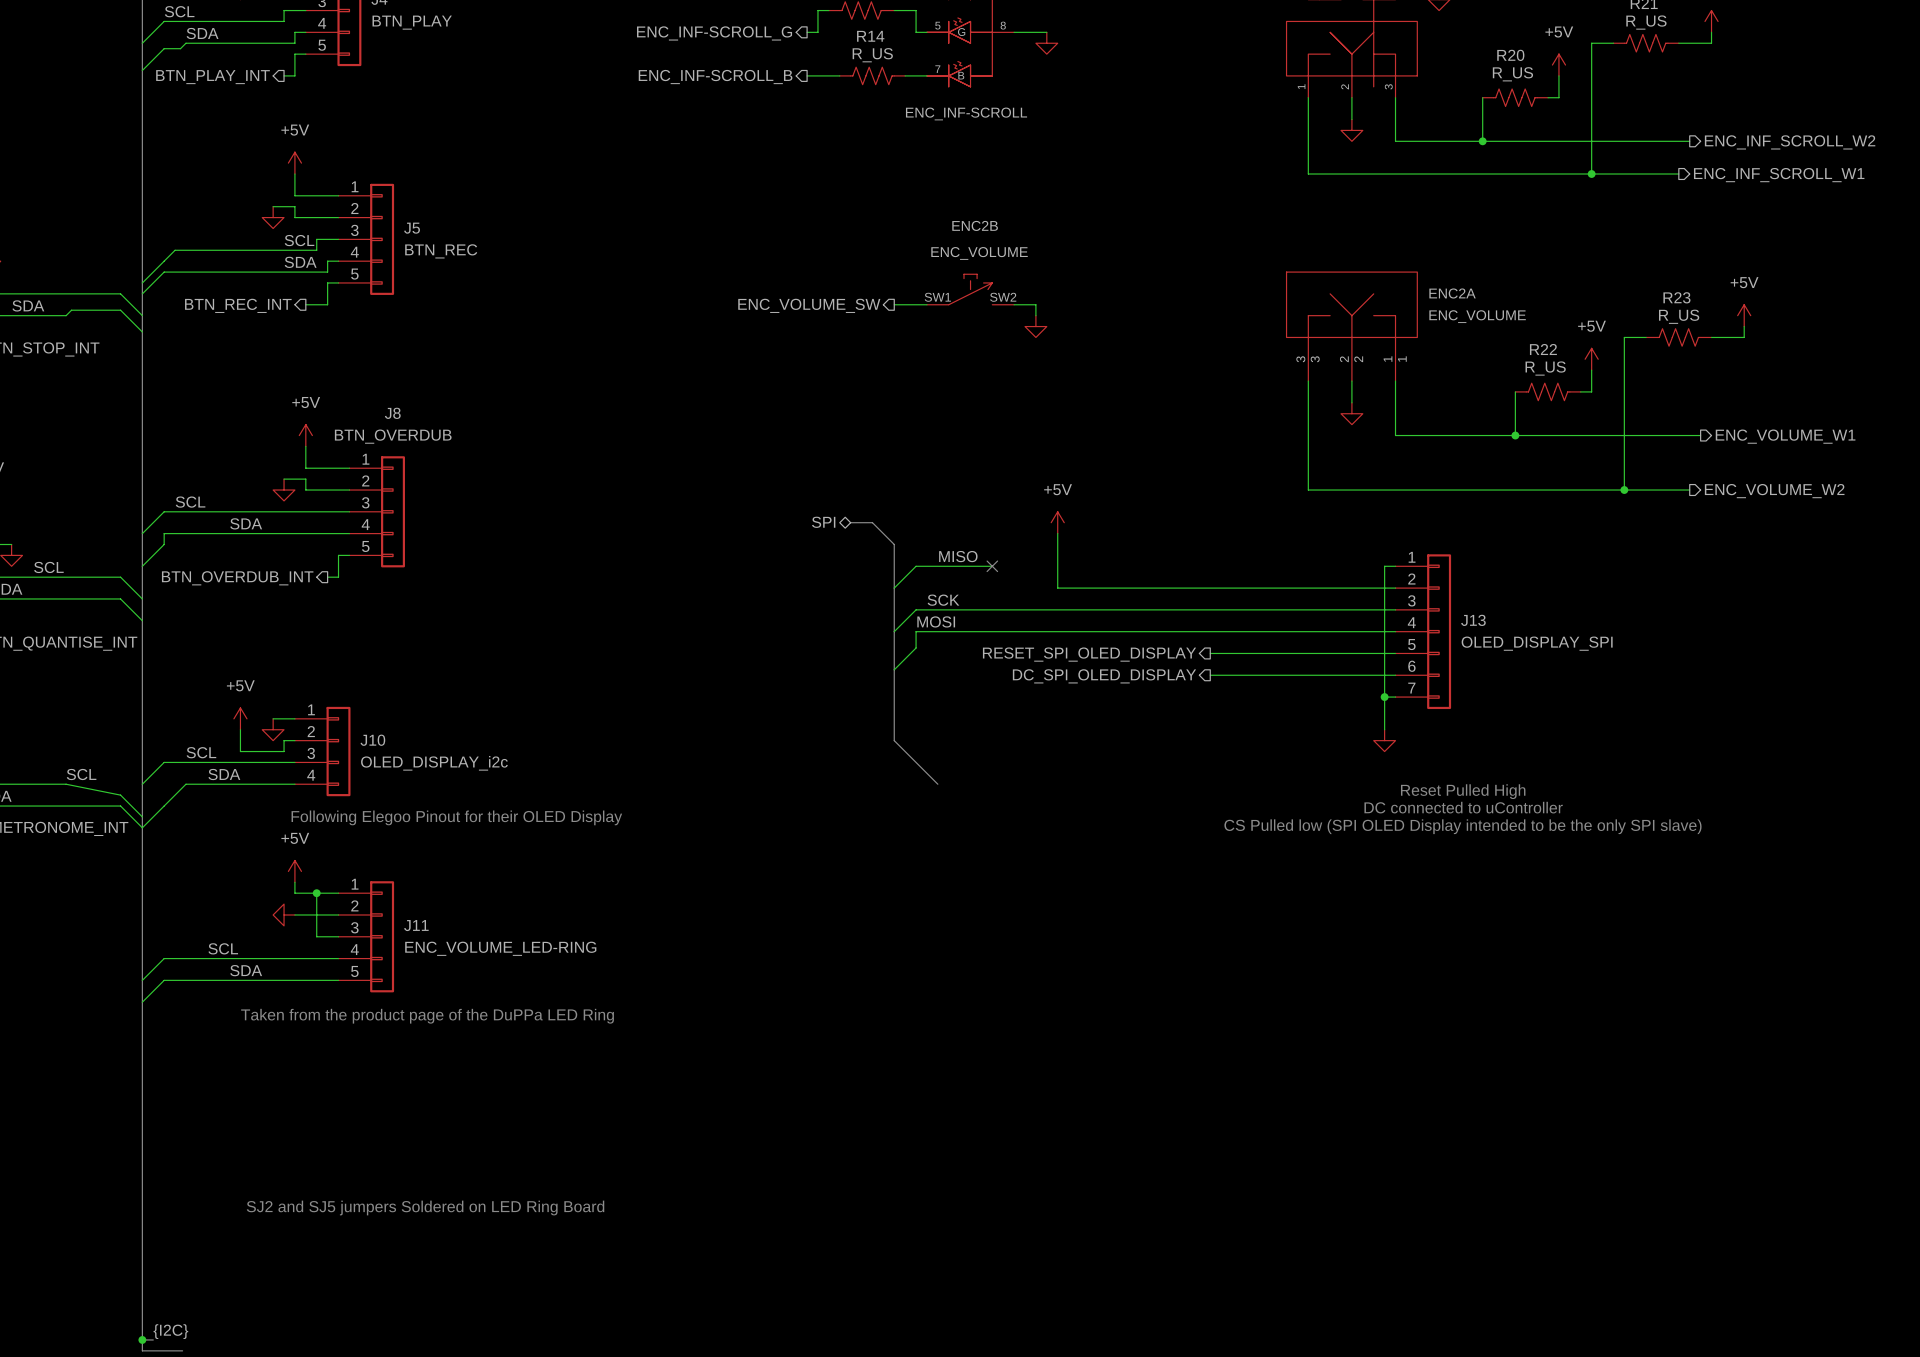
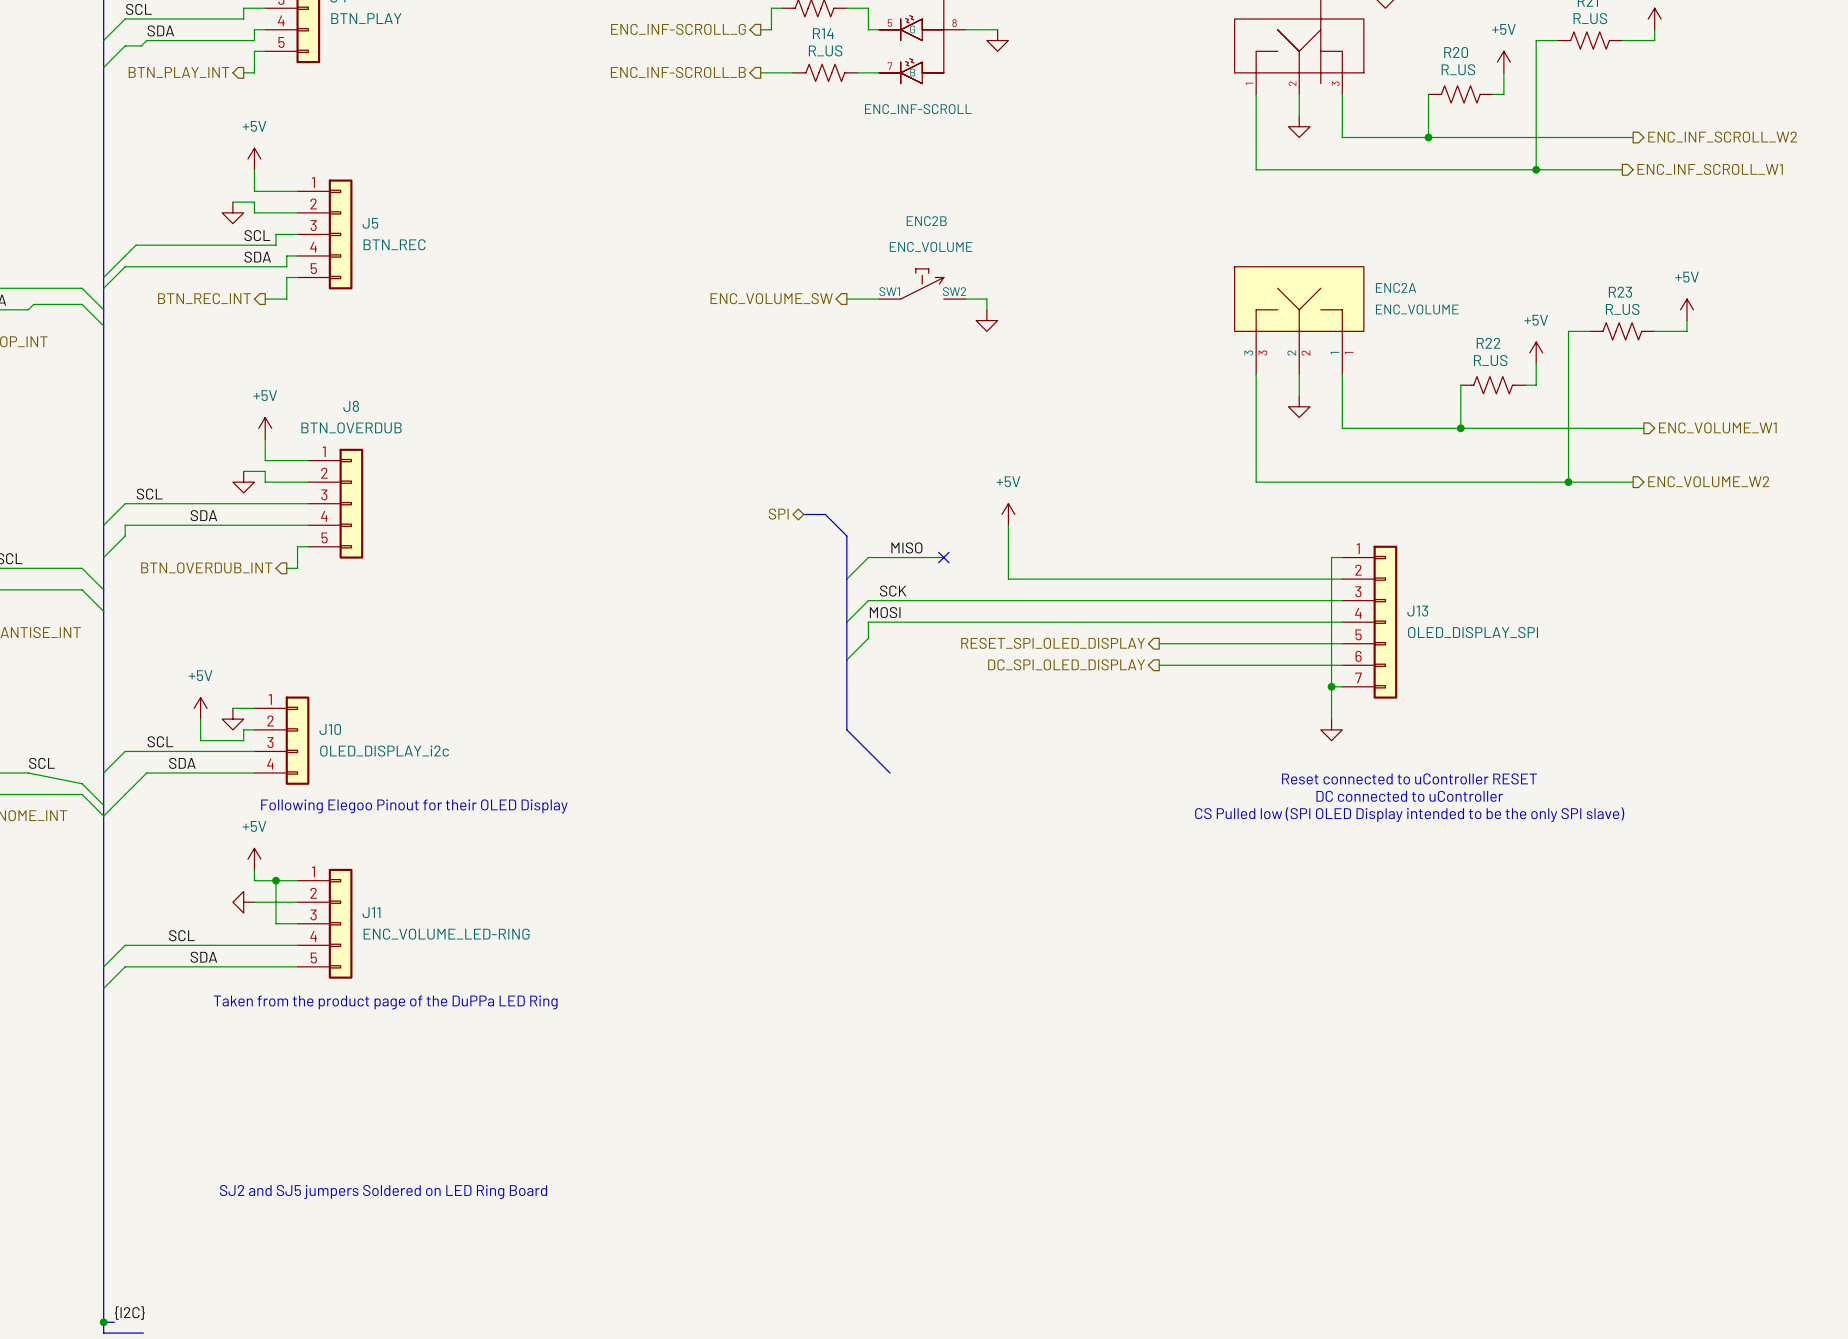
text: Reset Pulled High (1463, 791) -> Reset connected to uController RESET (1409, 778)

